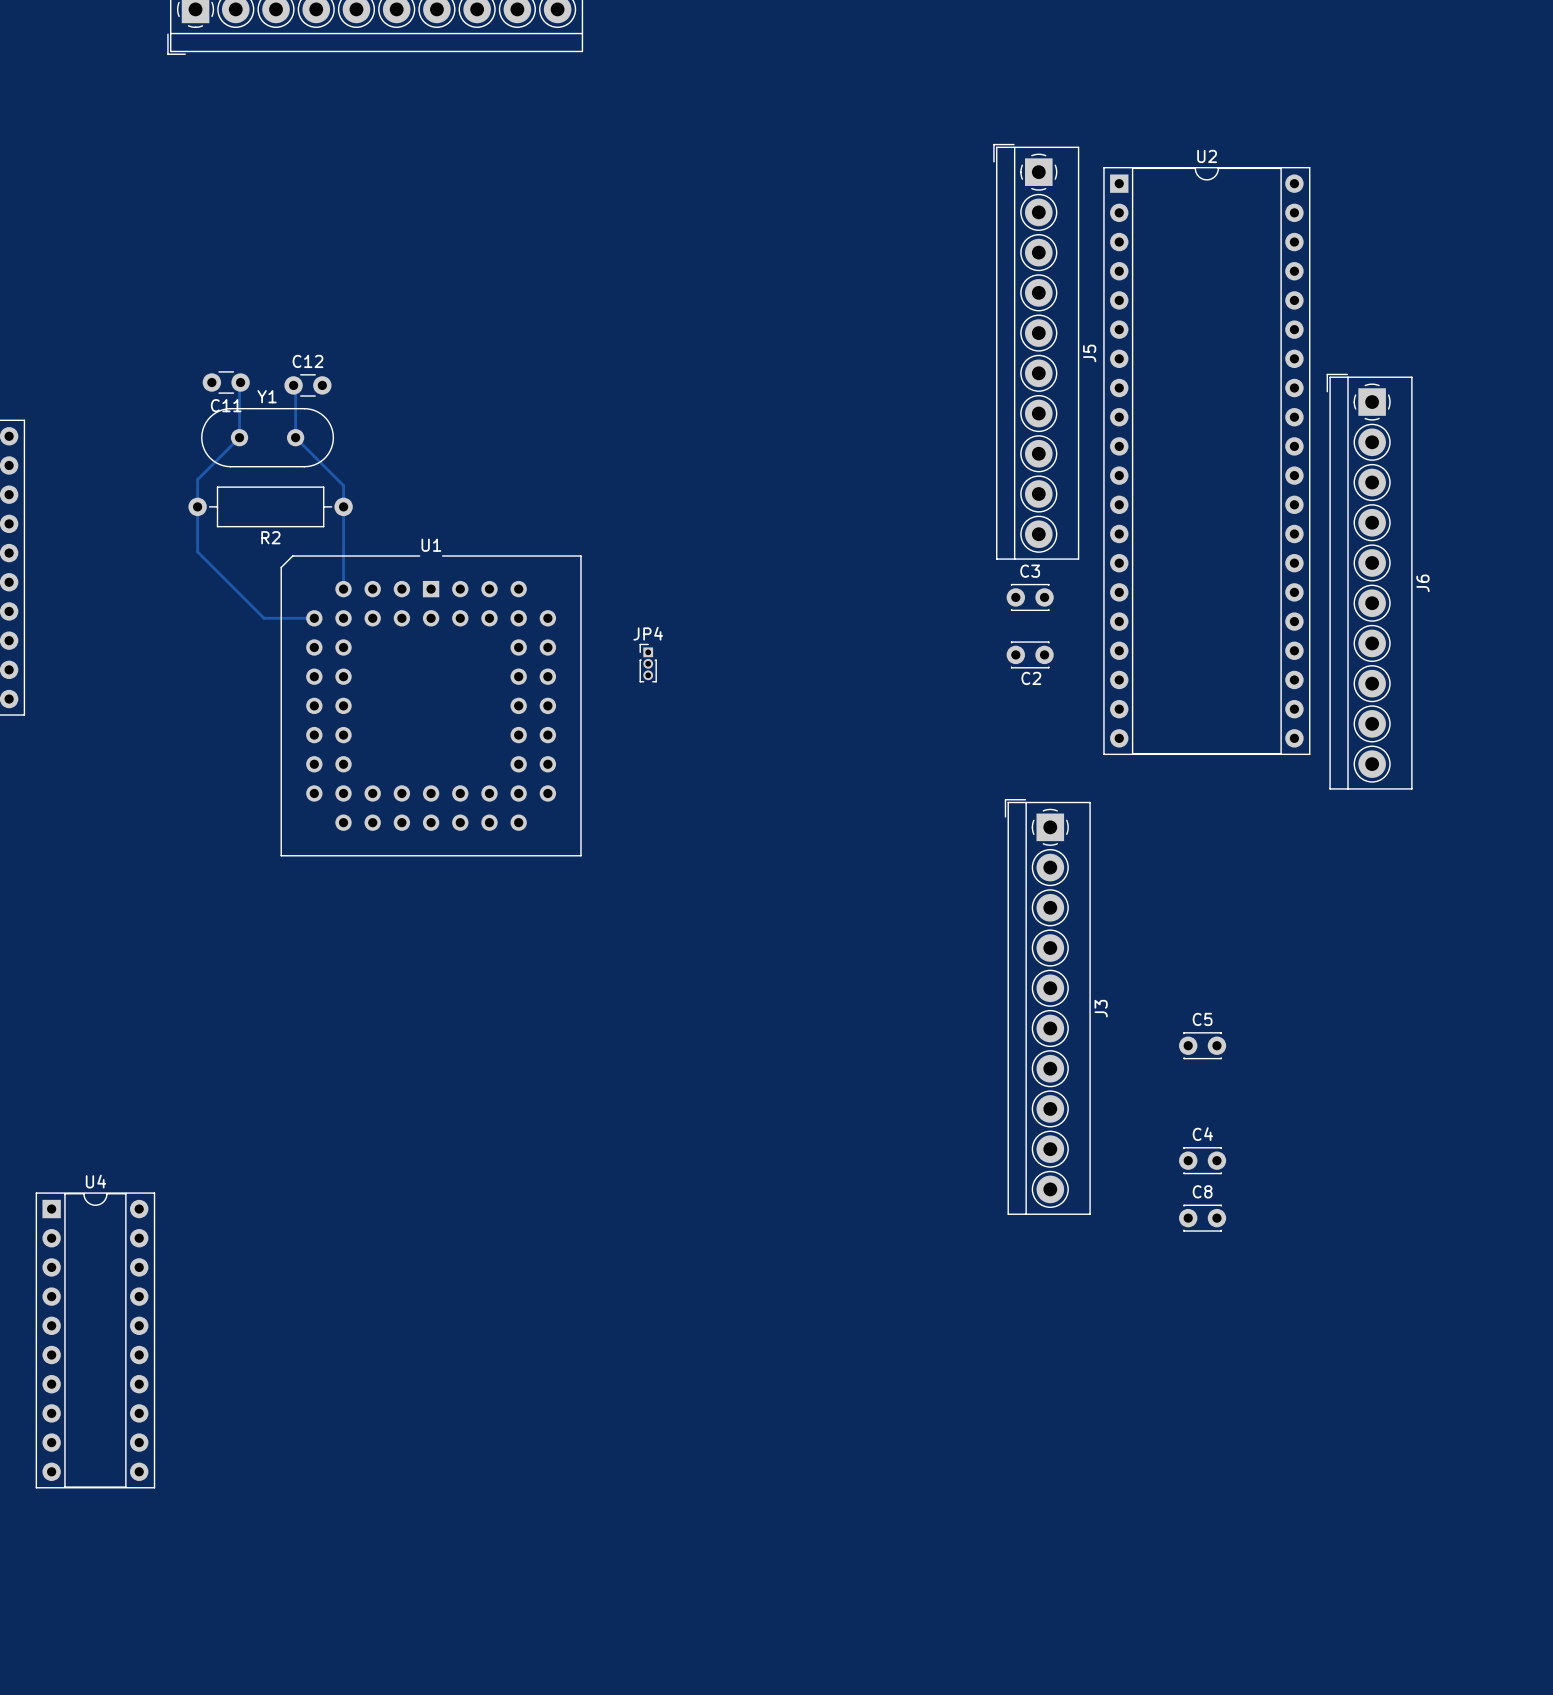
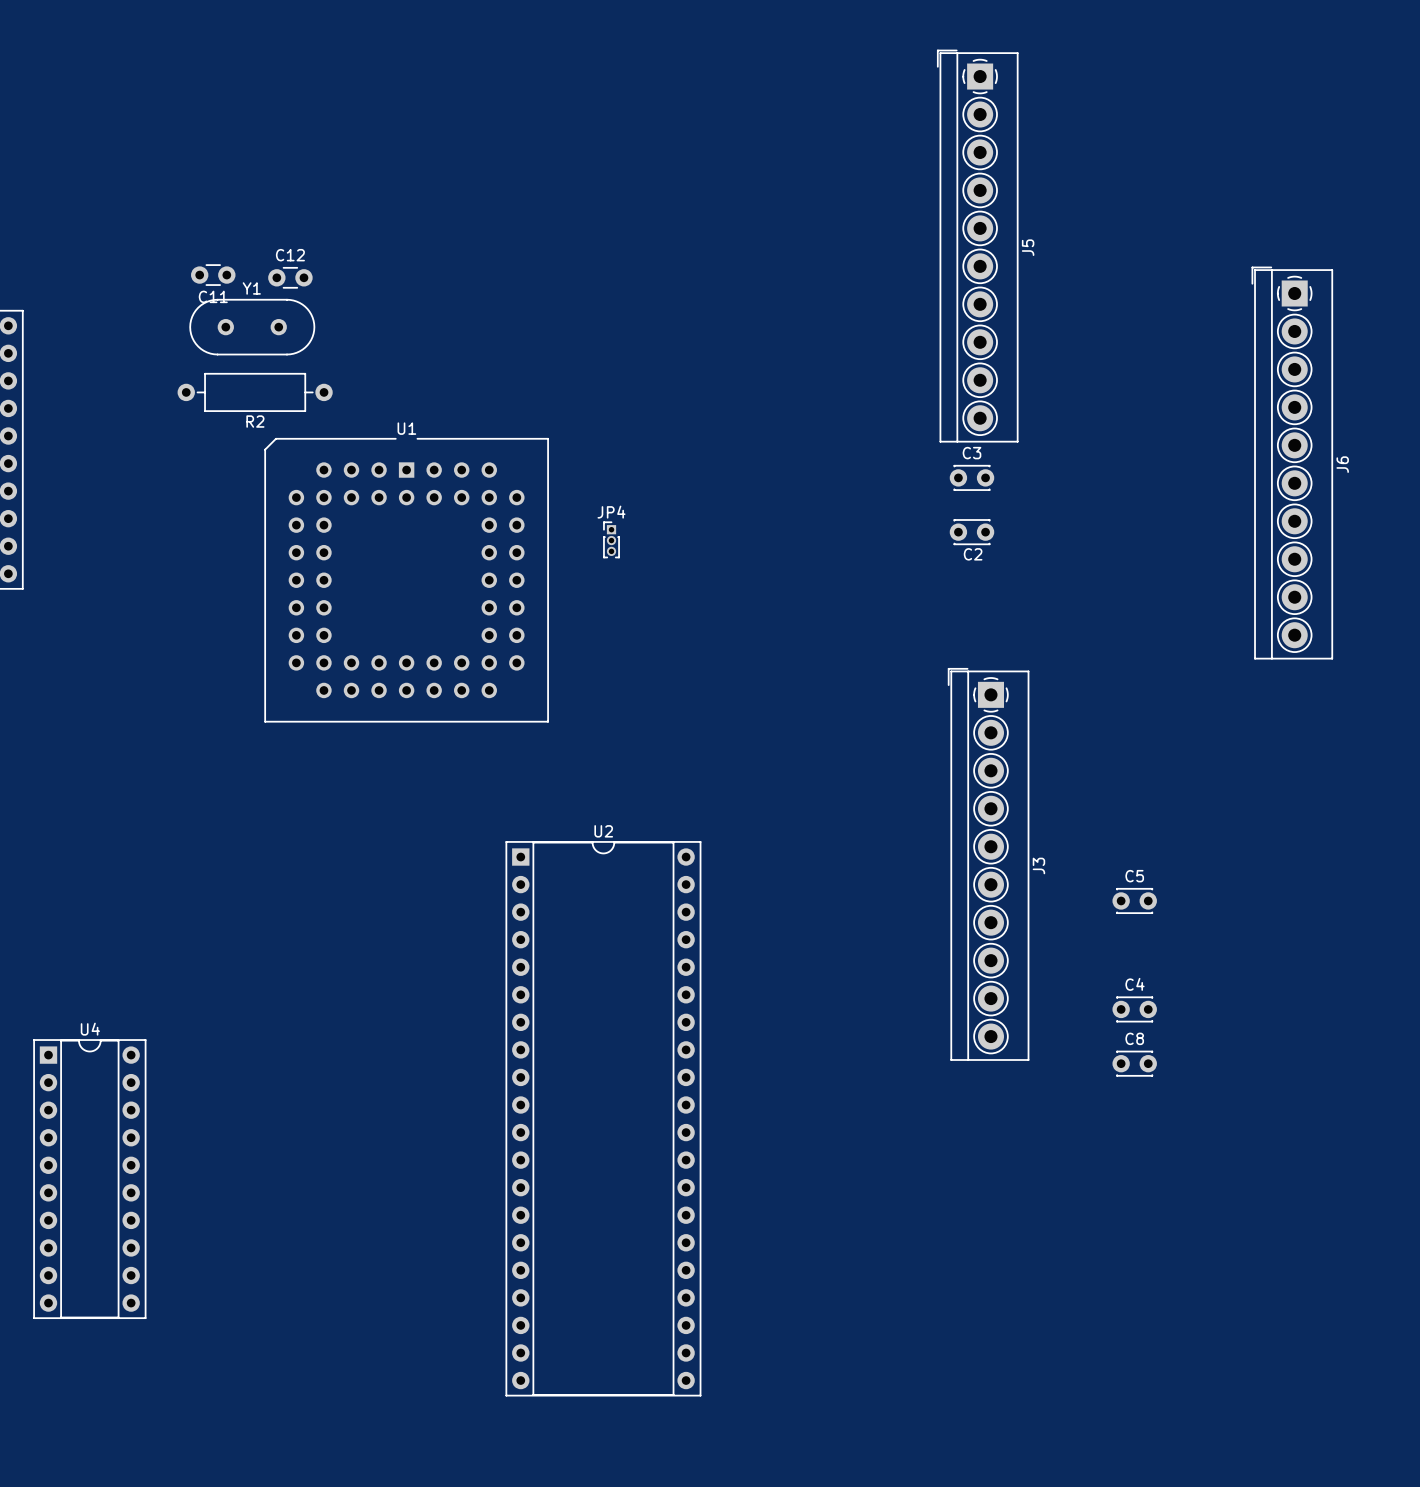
track: (240, 382) (239, 437) (197, 479) (197, 551) (264, 618) (314, 618) -> none
track: (293, 385) (295, 387) (295, 437) (343, 485) (343, 556) -> none
U2 position: (1206, 461) -> (603, 1118)
track: (343, 549) (343, 589) -> none

